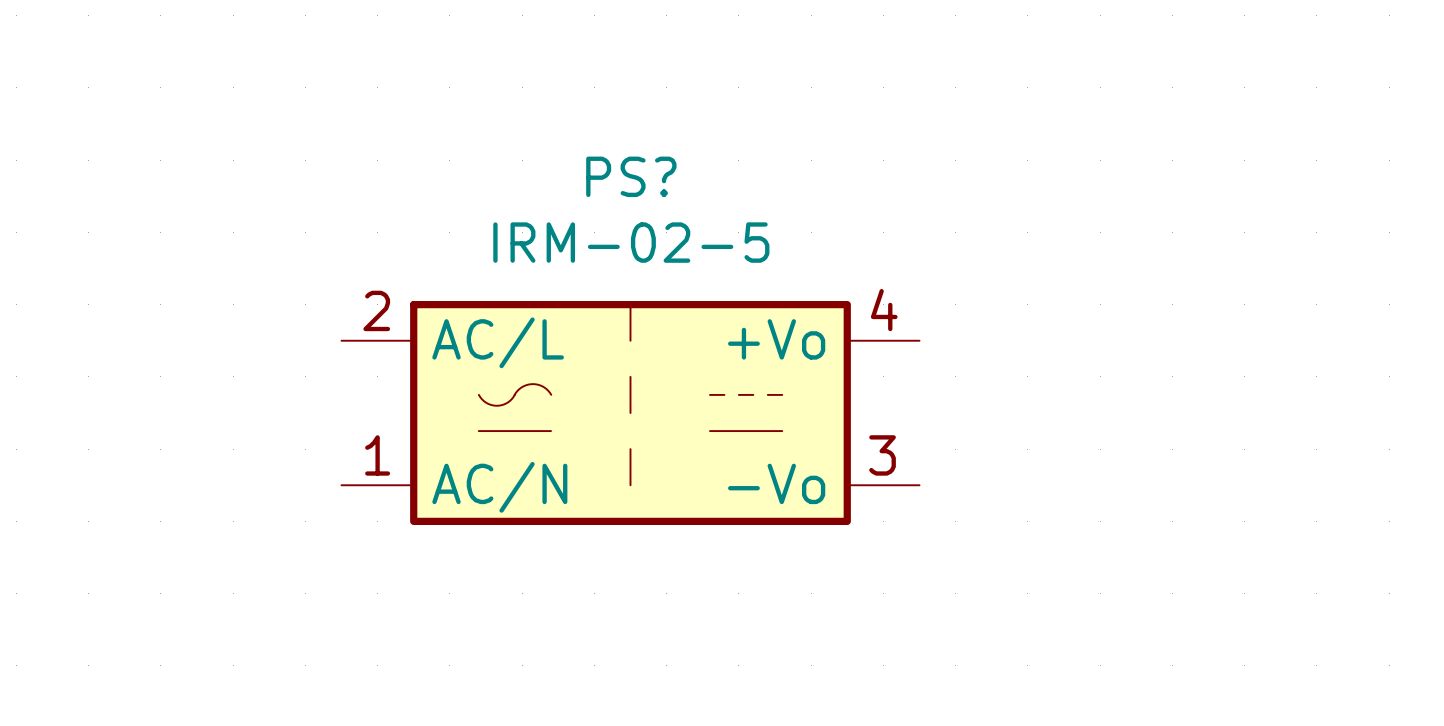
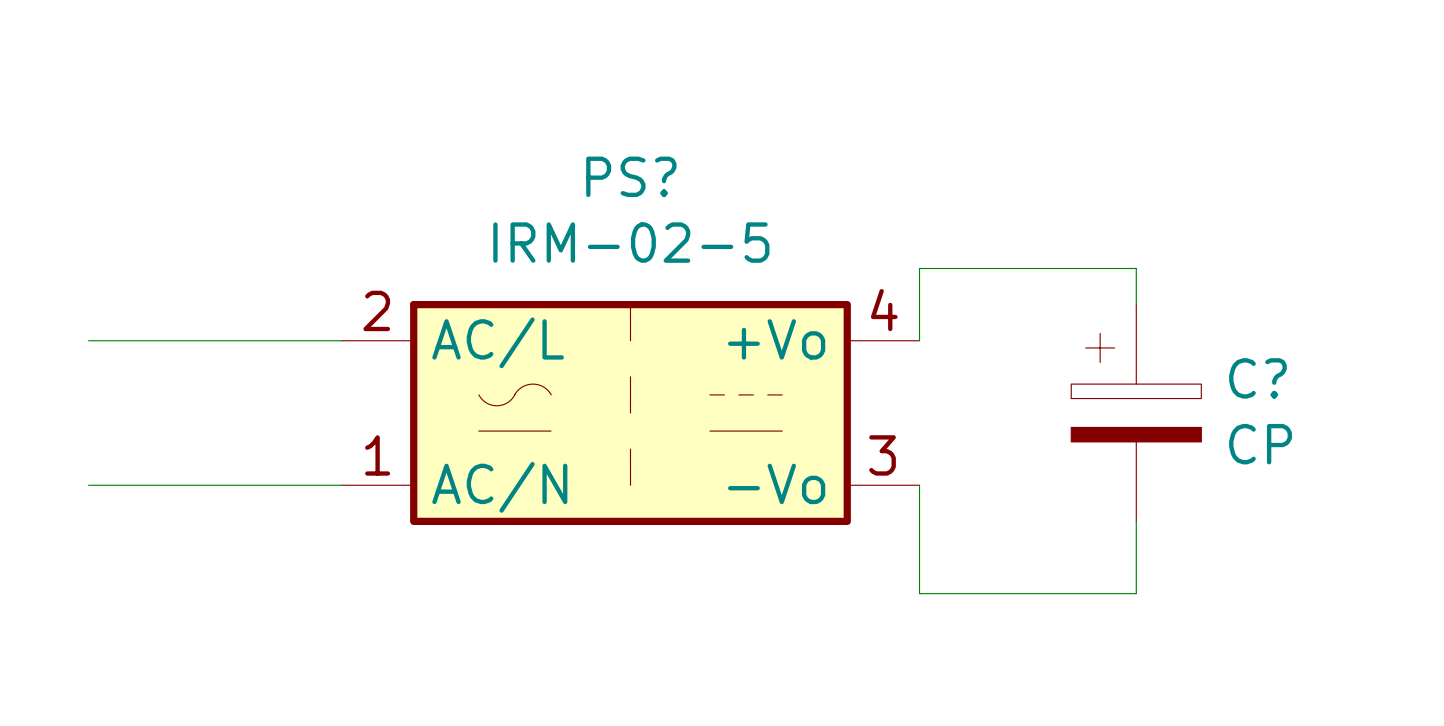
wire: none -> (1136, 304) (1136, 268) (919, 268) (919, 340)
wire: none -> (88, 340) (341, 340)
C?: none -> CP (1136, 413)
wire: none -> (88, 485) (341, 485)
wire: none -> (919, 485) (919, 593) (1136, 593) (1136, 521)

